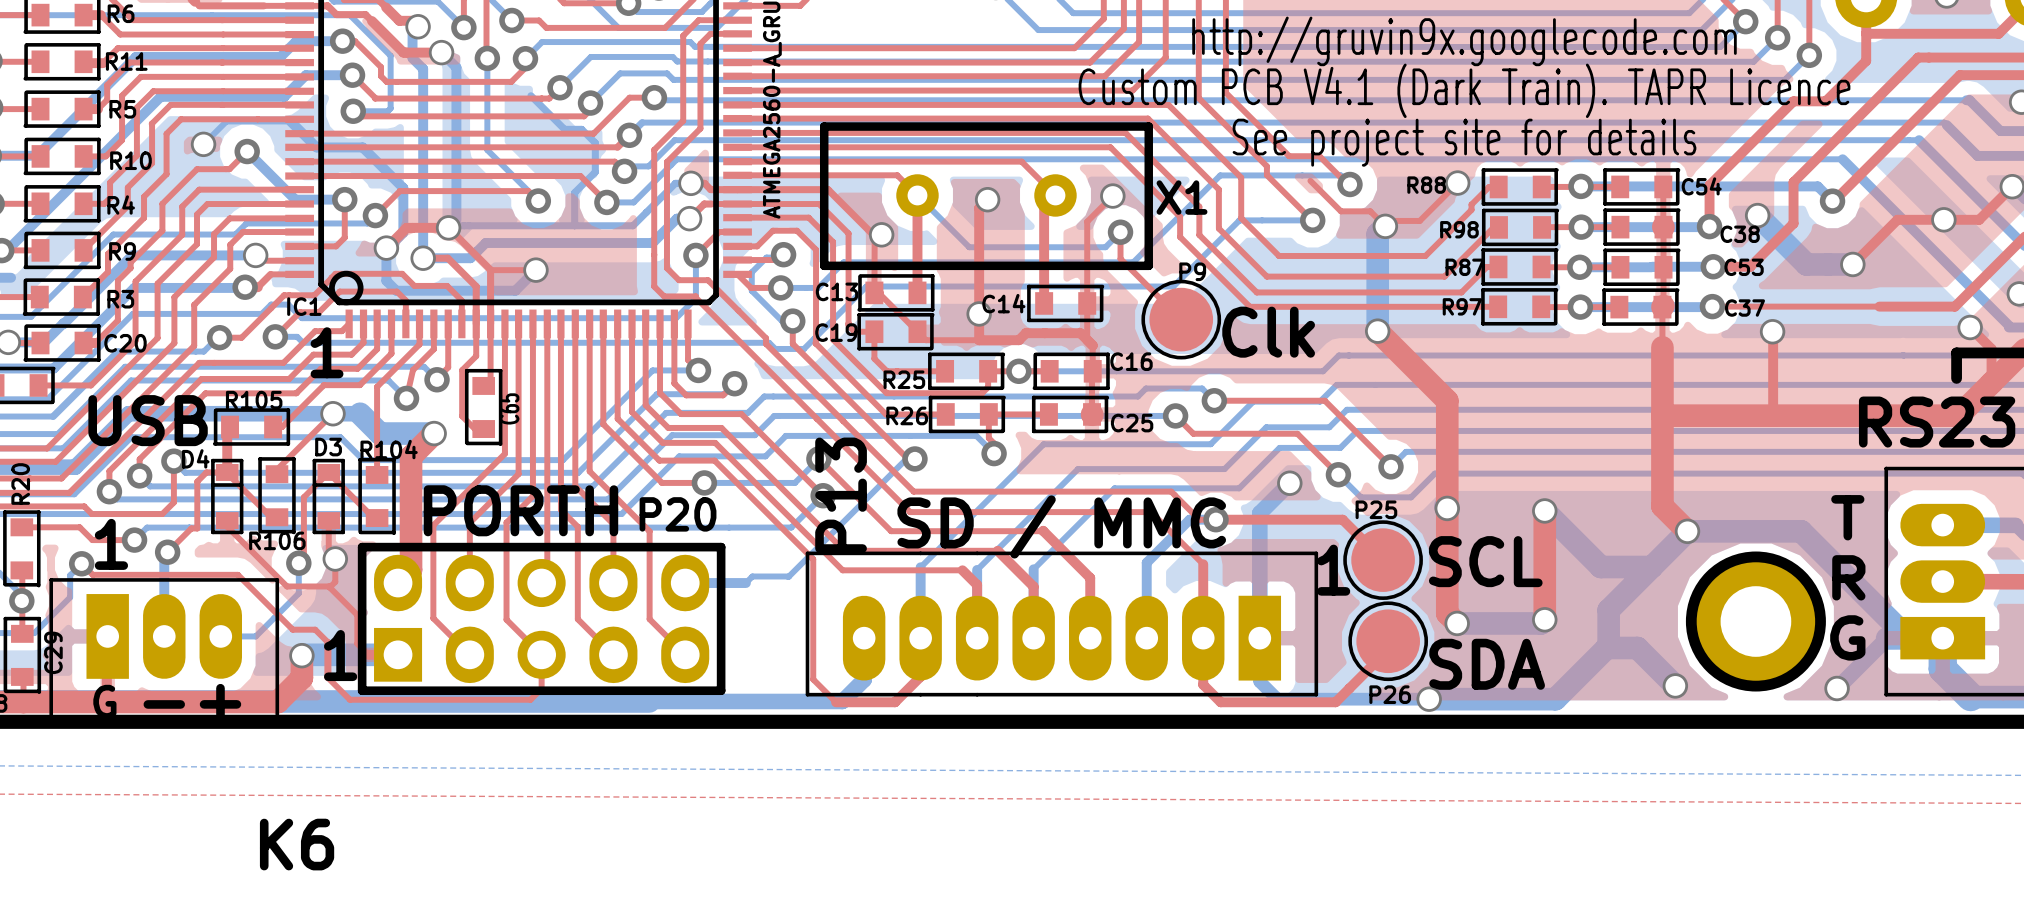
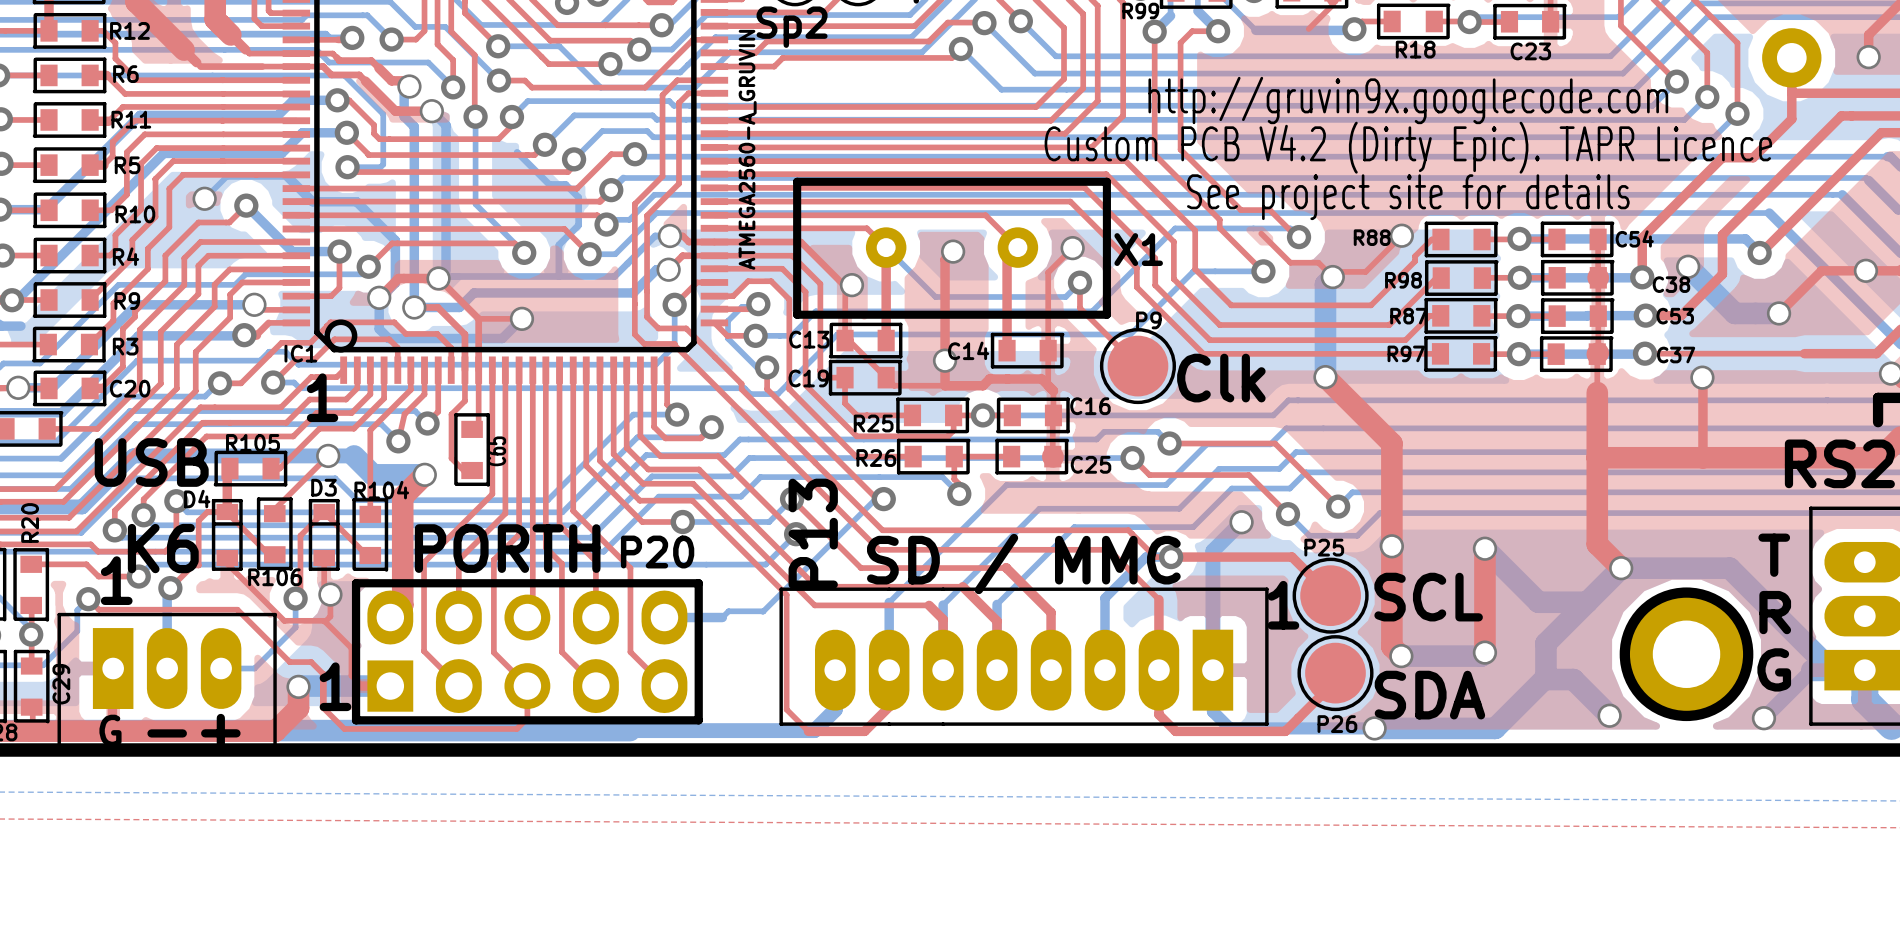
text: Custom PCB V4.1 (Dark Train). TAPR Licence (1464, 90) -> Custom PCB V4.2 (Dirty Epic). TAPR Licence (1408, 147)
K6 name position: K6 (297, 844) -> K6 (163, 548)

